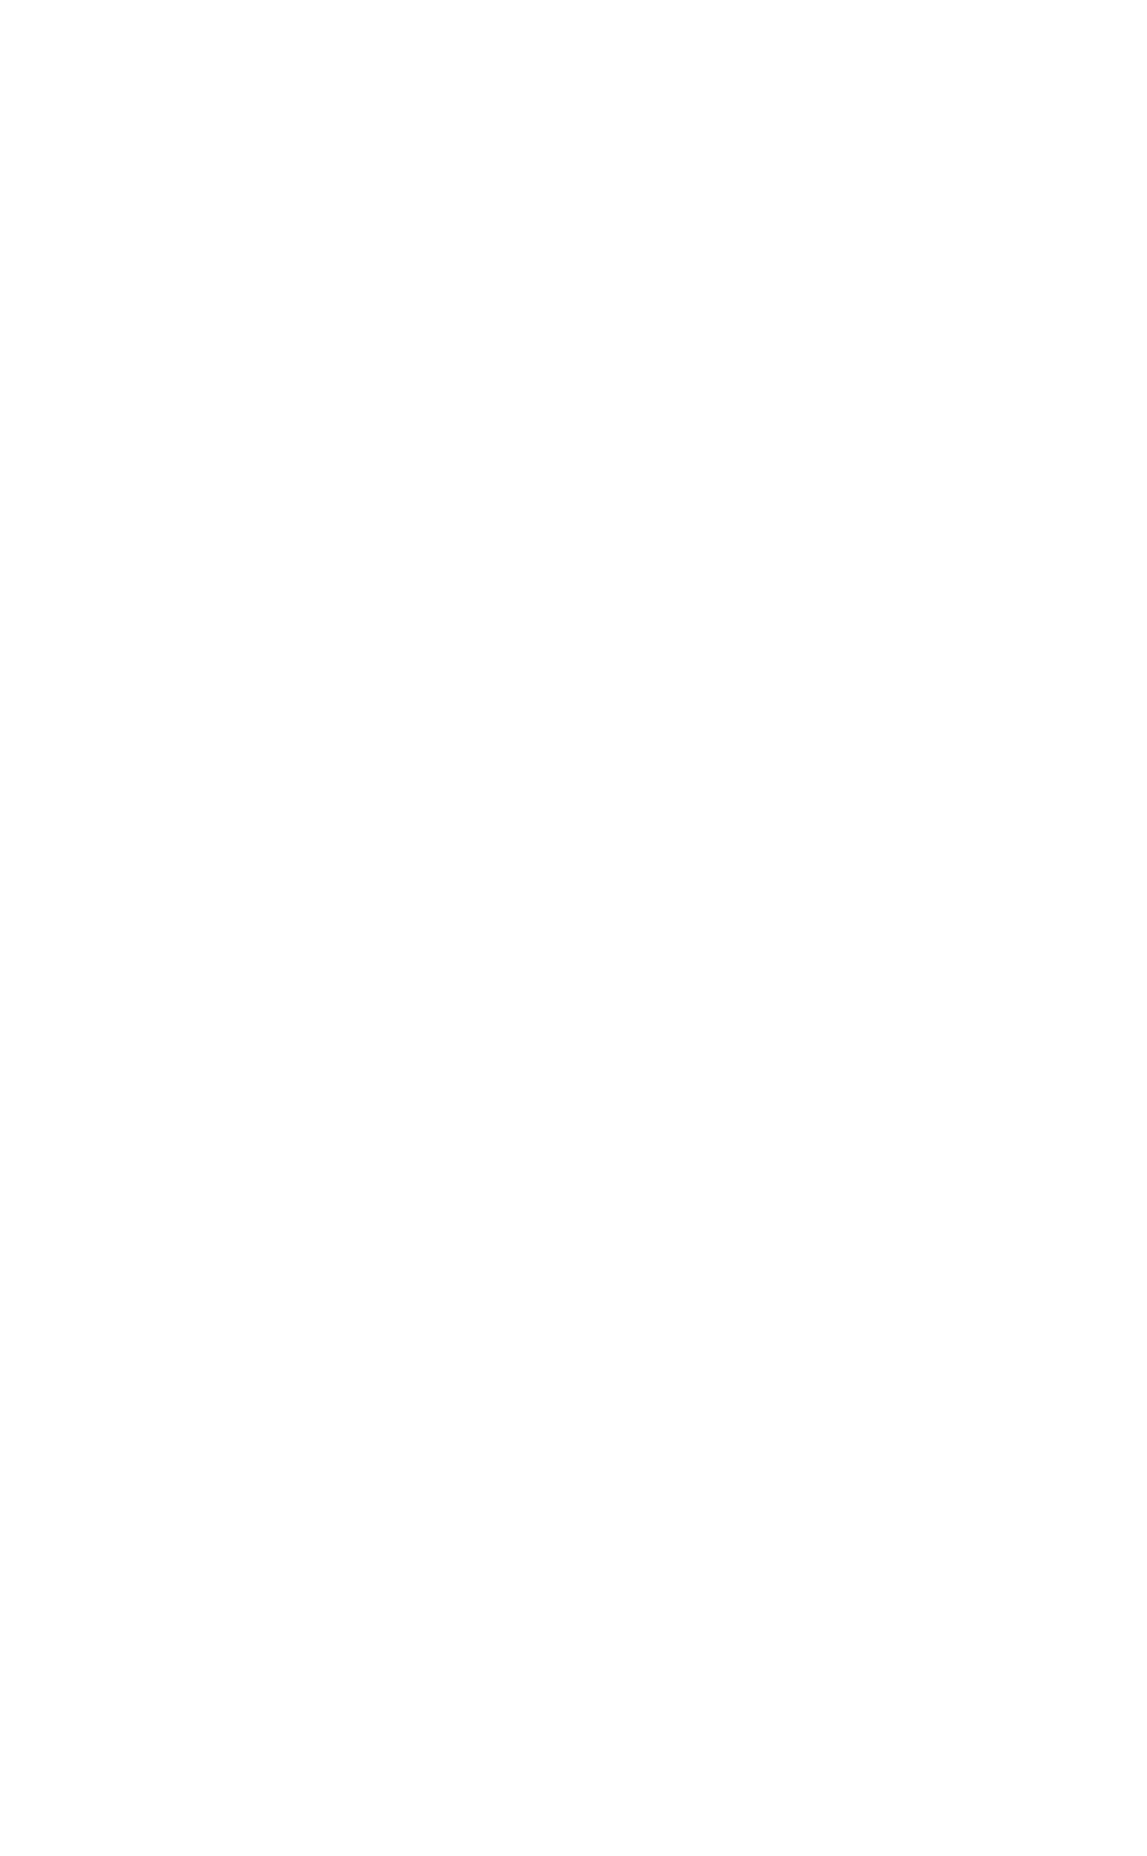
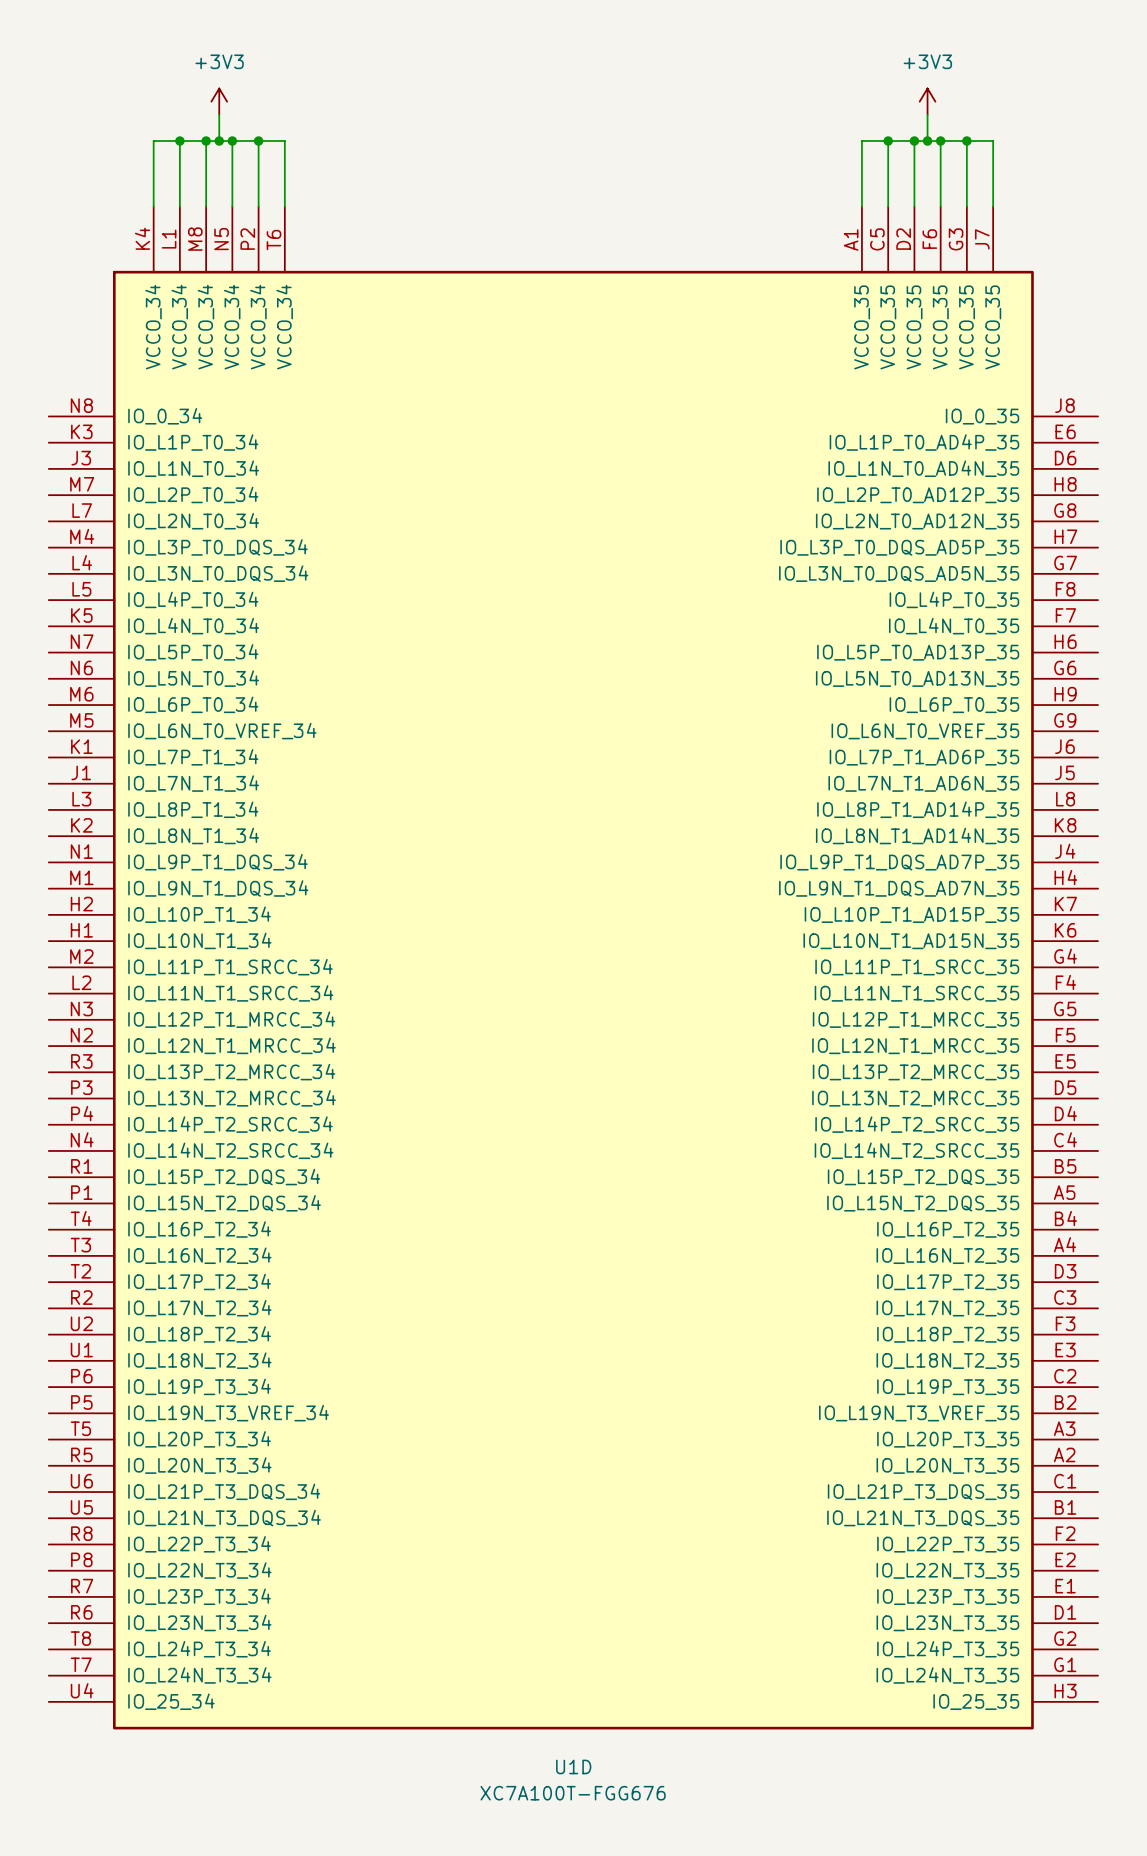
power symbol: none -> +3V3 (219, 101)
power symbol: none -> +3V3 (927, 101)
wire: none -> (219, 114) (219, 141)
wire: none -> (927, 114) (927, 141)
wire: none -> (179, 141) (179, 206)
junction: none -> (179, 141)
wire: none -> (206, 141) (206, 206)
junction: none -> (206, 141)
junction: none -> (219, 141)
wire: none -> (232, 141) (232, 206)
junction: none -> (232, 141)
wire: none -> (258, 141) (258, 206)
junction: none -> (258, 141)
wire: none -> (888, 141) (888, 206)
junction: none -> (888, 141)
wire: none -> (914, 141) (914, 206)
junction: none -> (914, 141)
junction: none -> (927, 141)
wire: none -> (940, 141) (940, 206)
junction: none -> (940, 141)
wire: none -> (966, 141) (966, 206)
junction: none -> (966, 141)
wire: none -> (153, 206) (153, 141) (284, 141) (284, 206)
wire: none -> (861, 206) (861, 141) (993, 141) (993, 206)
U1D: none -> XC7A100T-FGG676 (573, 968)

